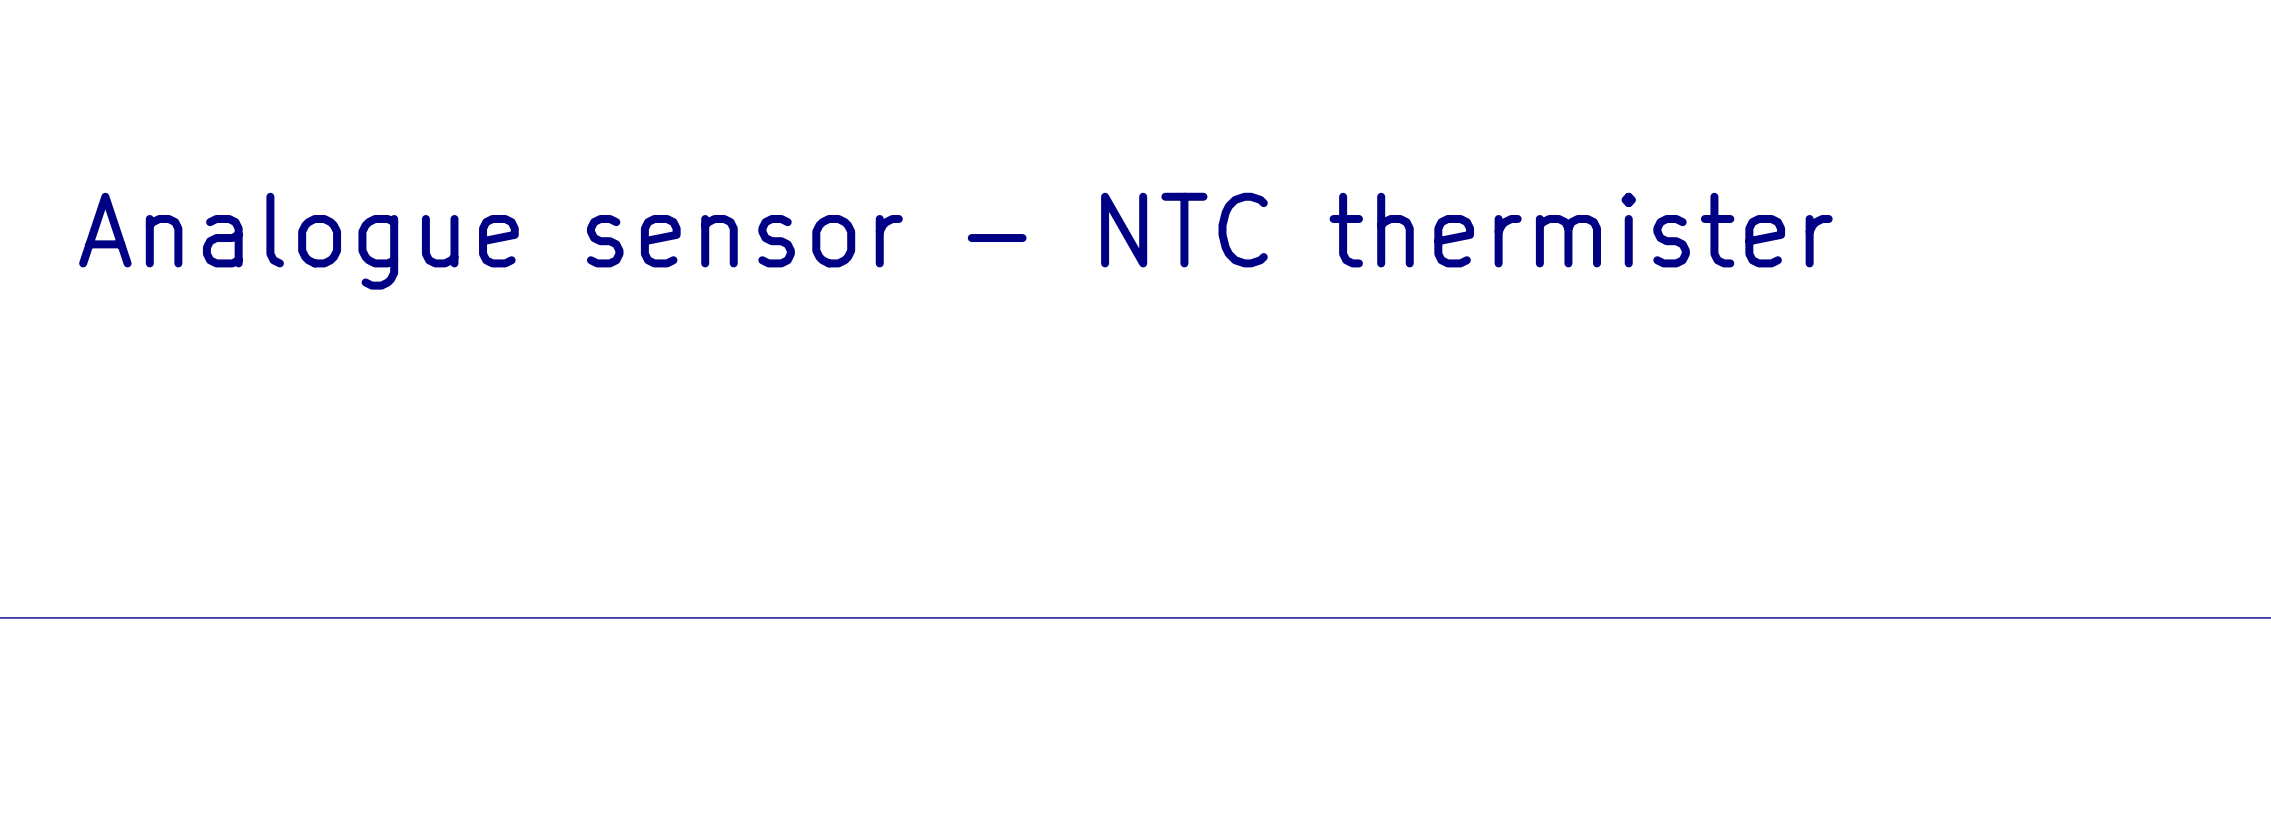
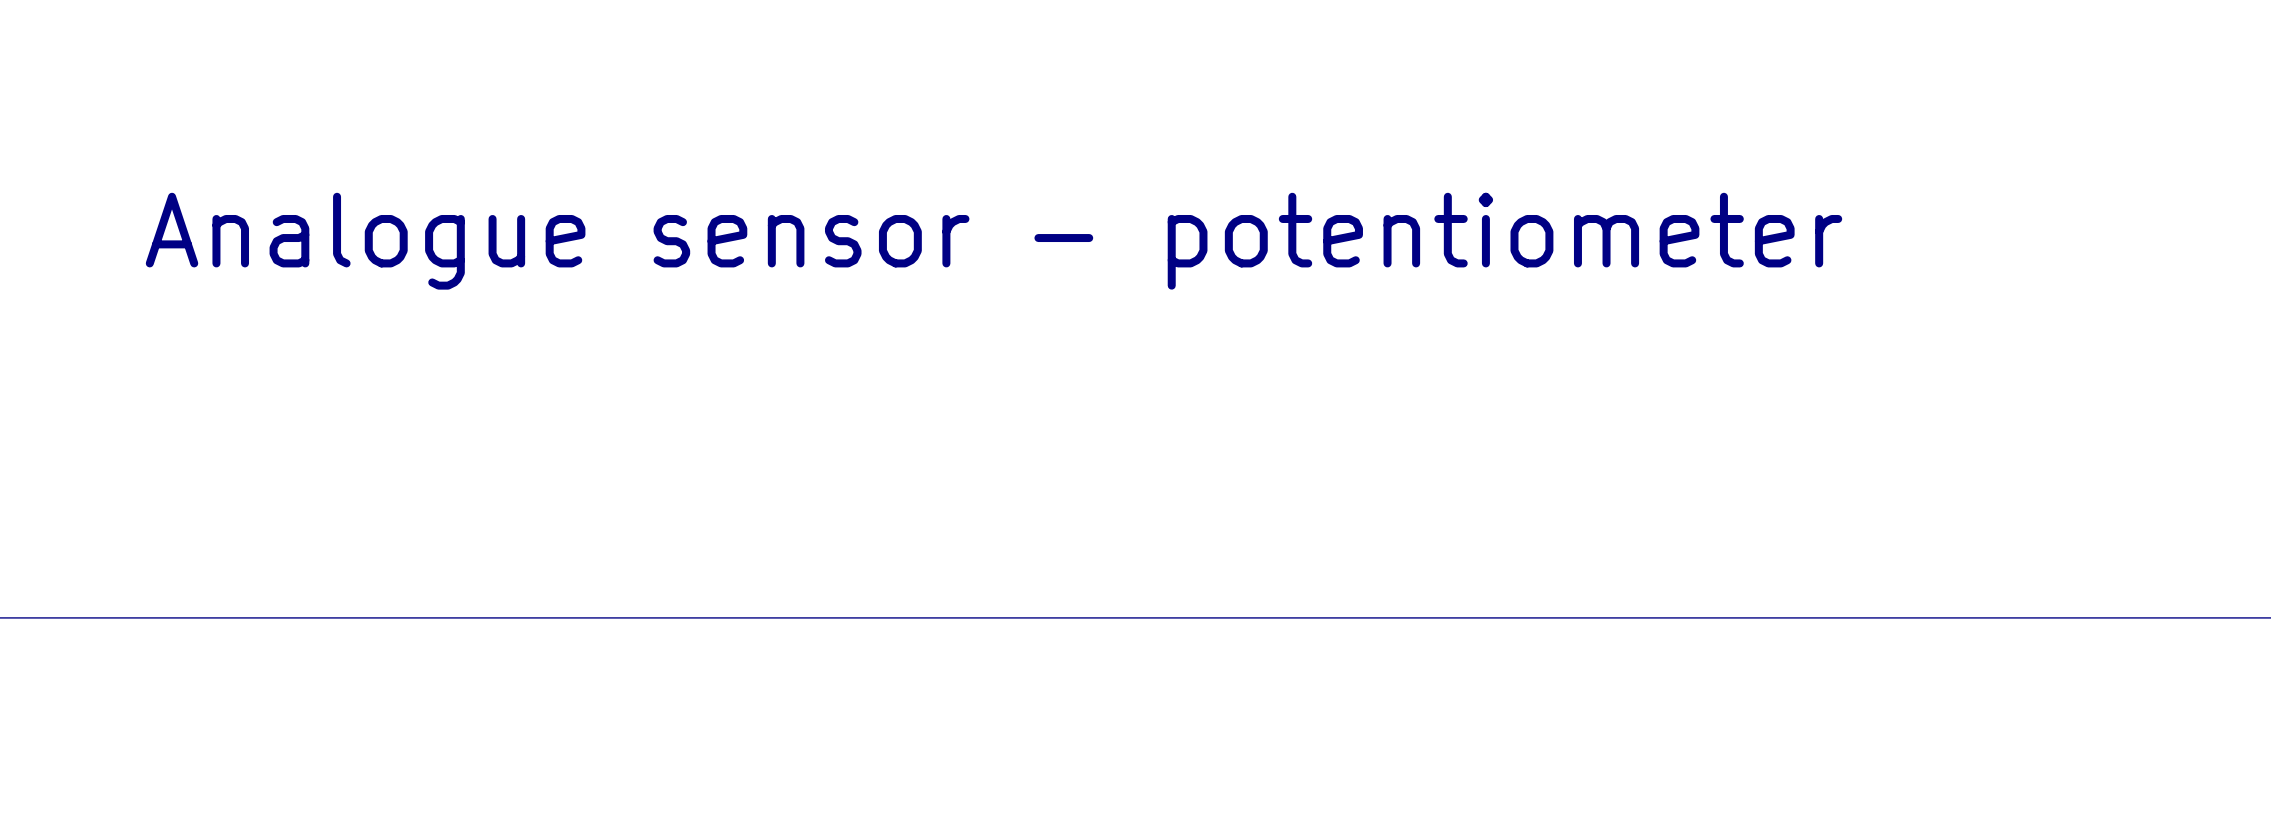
text: Analogue sensor - NTC thermister (955, 241) -> Analogue sensor - potentiometer (994, 241)

